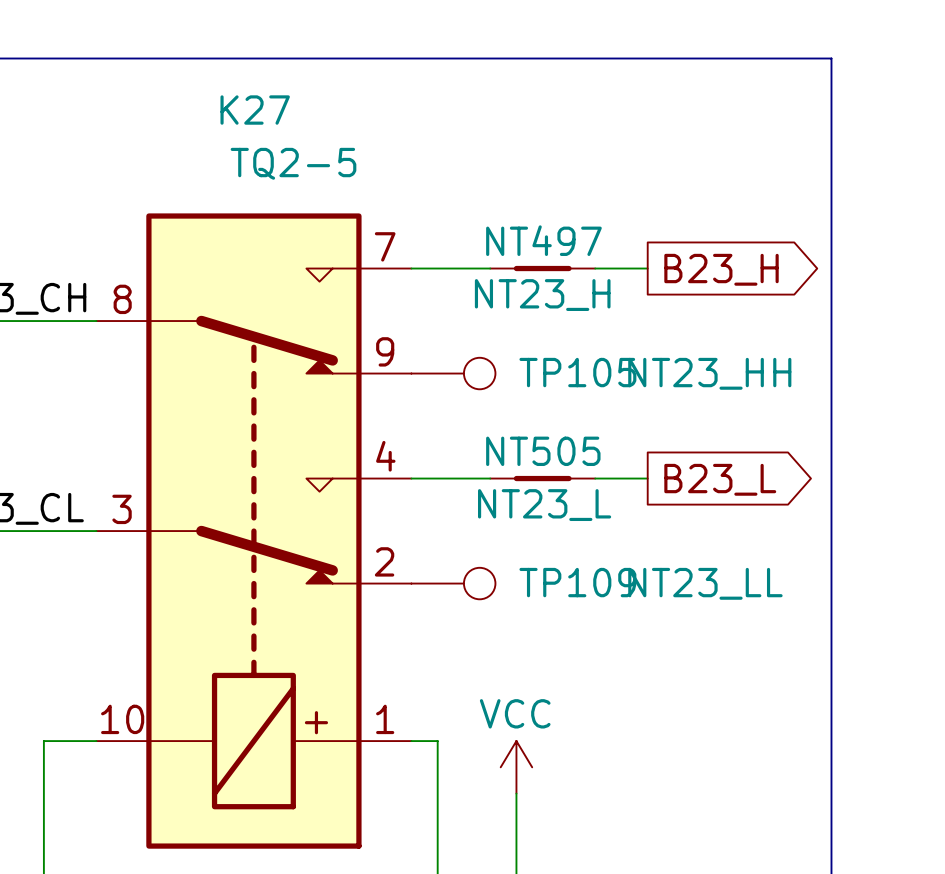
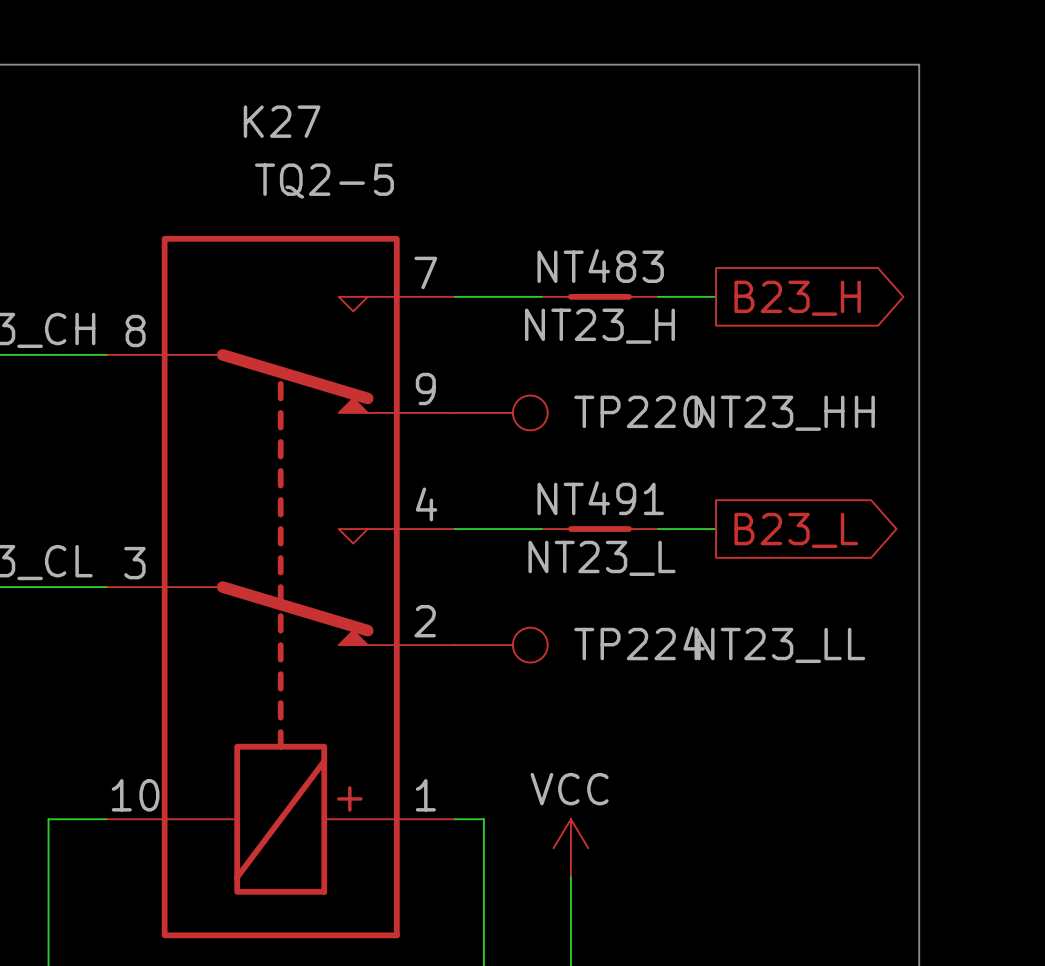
NT497 name: NT497 (543, 240) -> NT483 (600, 266)
TP105 name: TP105 (577, 372) -> TP220 (638, 411)
NT505 name: NT505 (543, 451) -> NT491 (600, 498)
TP109 name: TP109 (577, 582) -> TP224 (639, 643)

